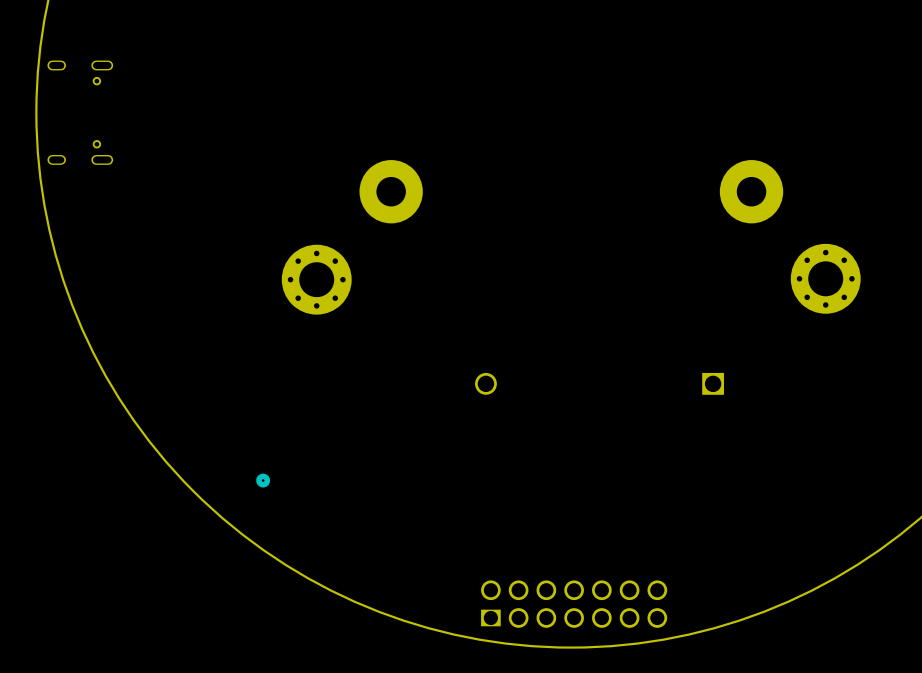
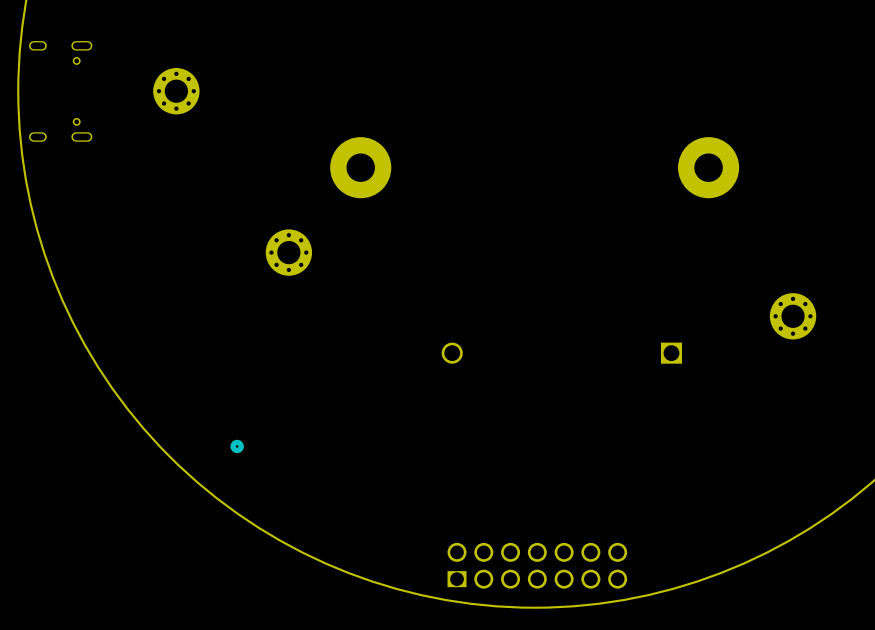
part: none -> (176, 91)
part footprint: [281, 244, 352, 315] -> [265, 229, 313, 276]
part: (825, 278) -> none
part: none -> (793, 316)

